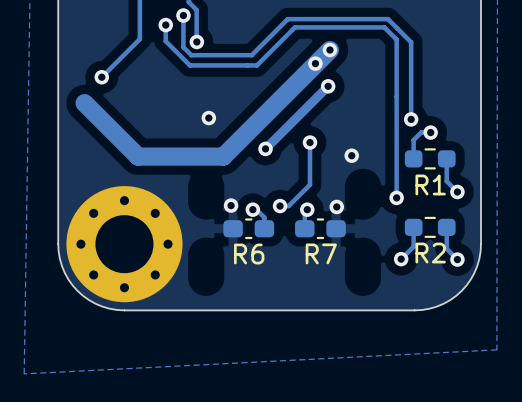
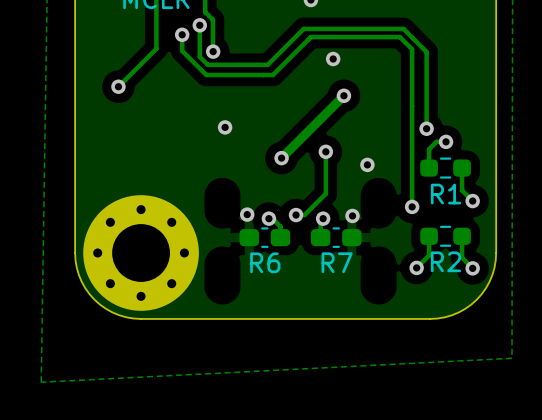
via: none -> (333, 59)
track: (329, 50) (223, 156) (138, 156) (84, 103) -> none
via: (329, 50) -> none
via: (315, 63) -> none

